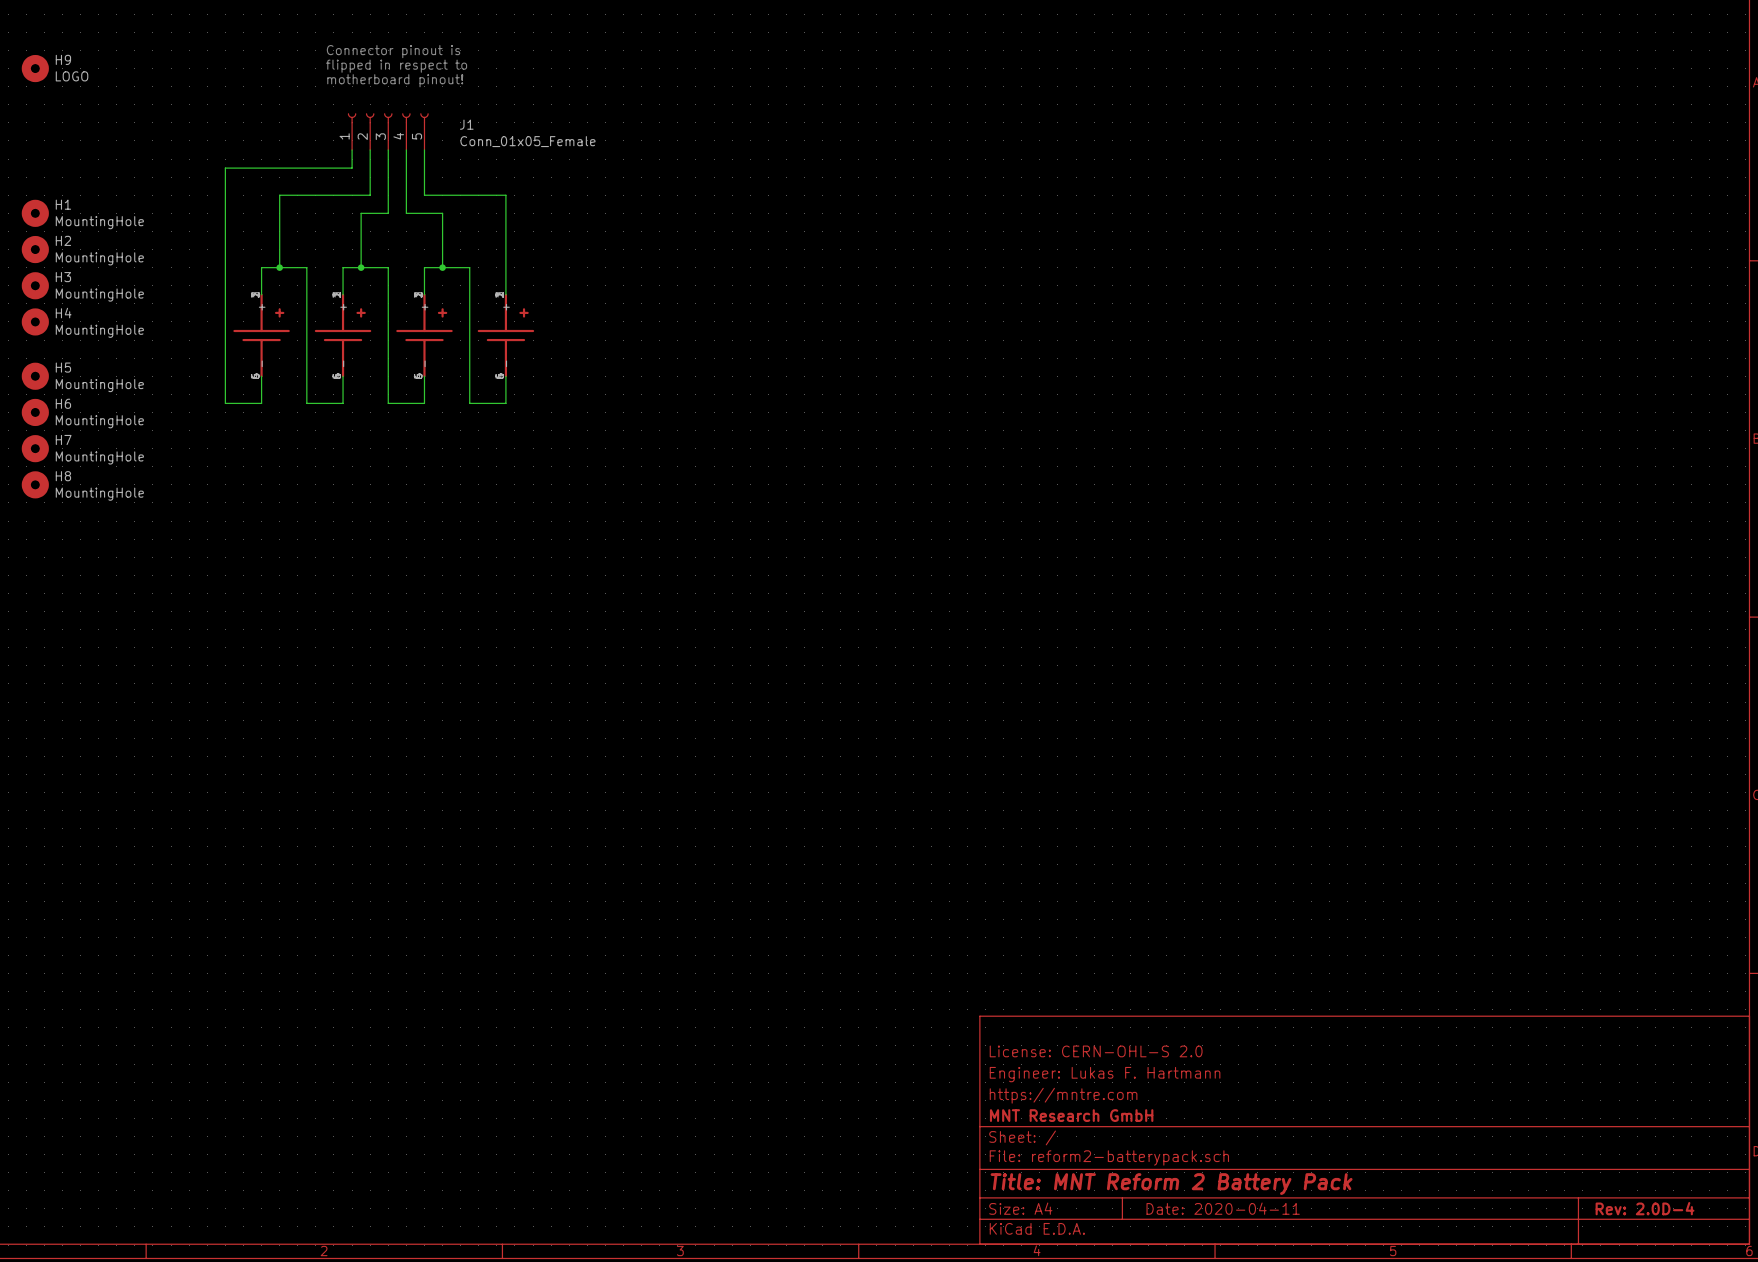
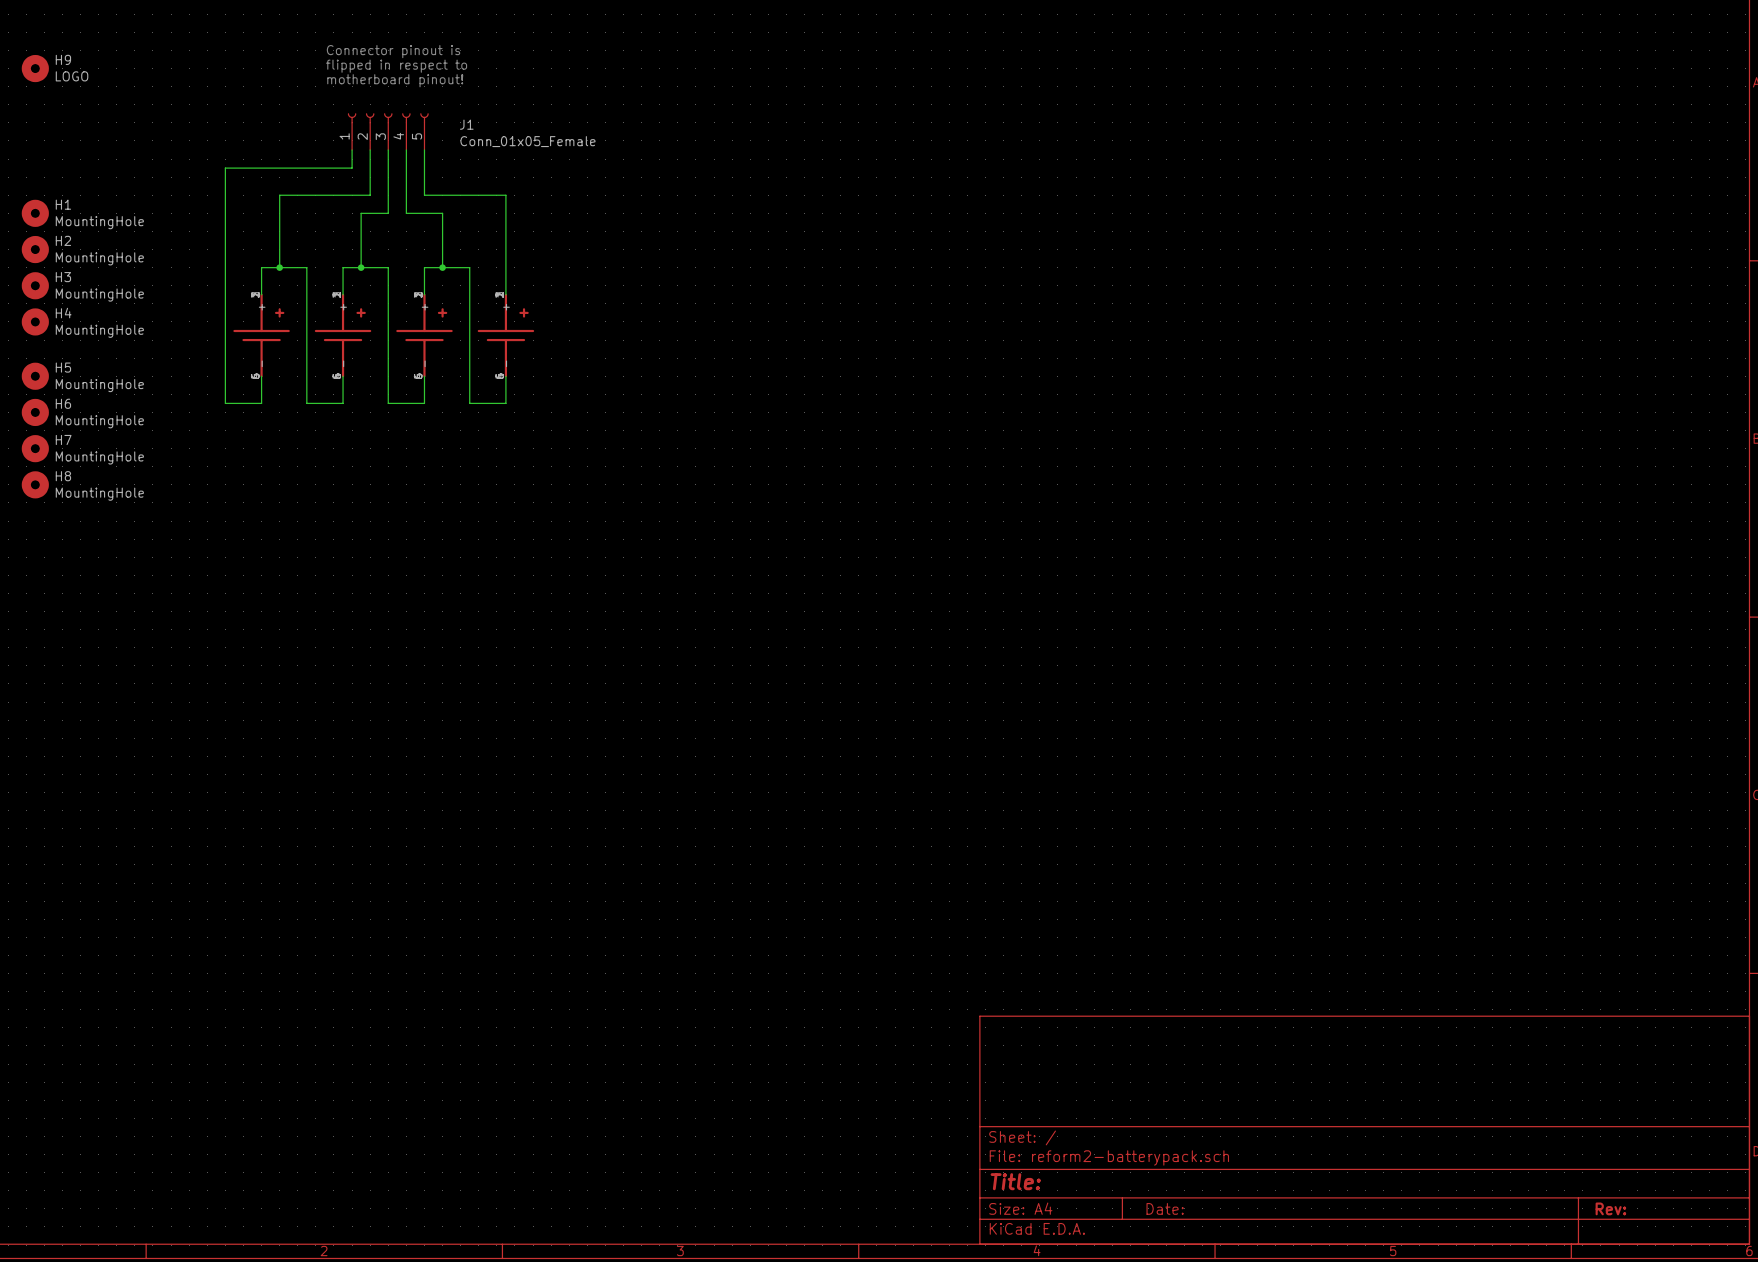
title block: License: CERN-OHL-S 2.0 (1096, 1051) -> none
title block: Engineer: Lukas F. Hartmann (1105, 1074) -> none
title block: https://mntre.com (1063, 1095) -> none
title block: MNT Research GmbH (1071, 1115) -> none
title block: Title: MNT Reform 2 Battery Pack (1171, 1184) -> Title: (1015, 1181)
title block: Date: 2020-04-11 (1223, 1208) -> Date: (1165, 1208)
title block: Rev: 2.0D-4 (1645, 1208) -> Rev: (1610, 1208)

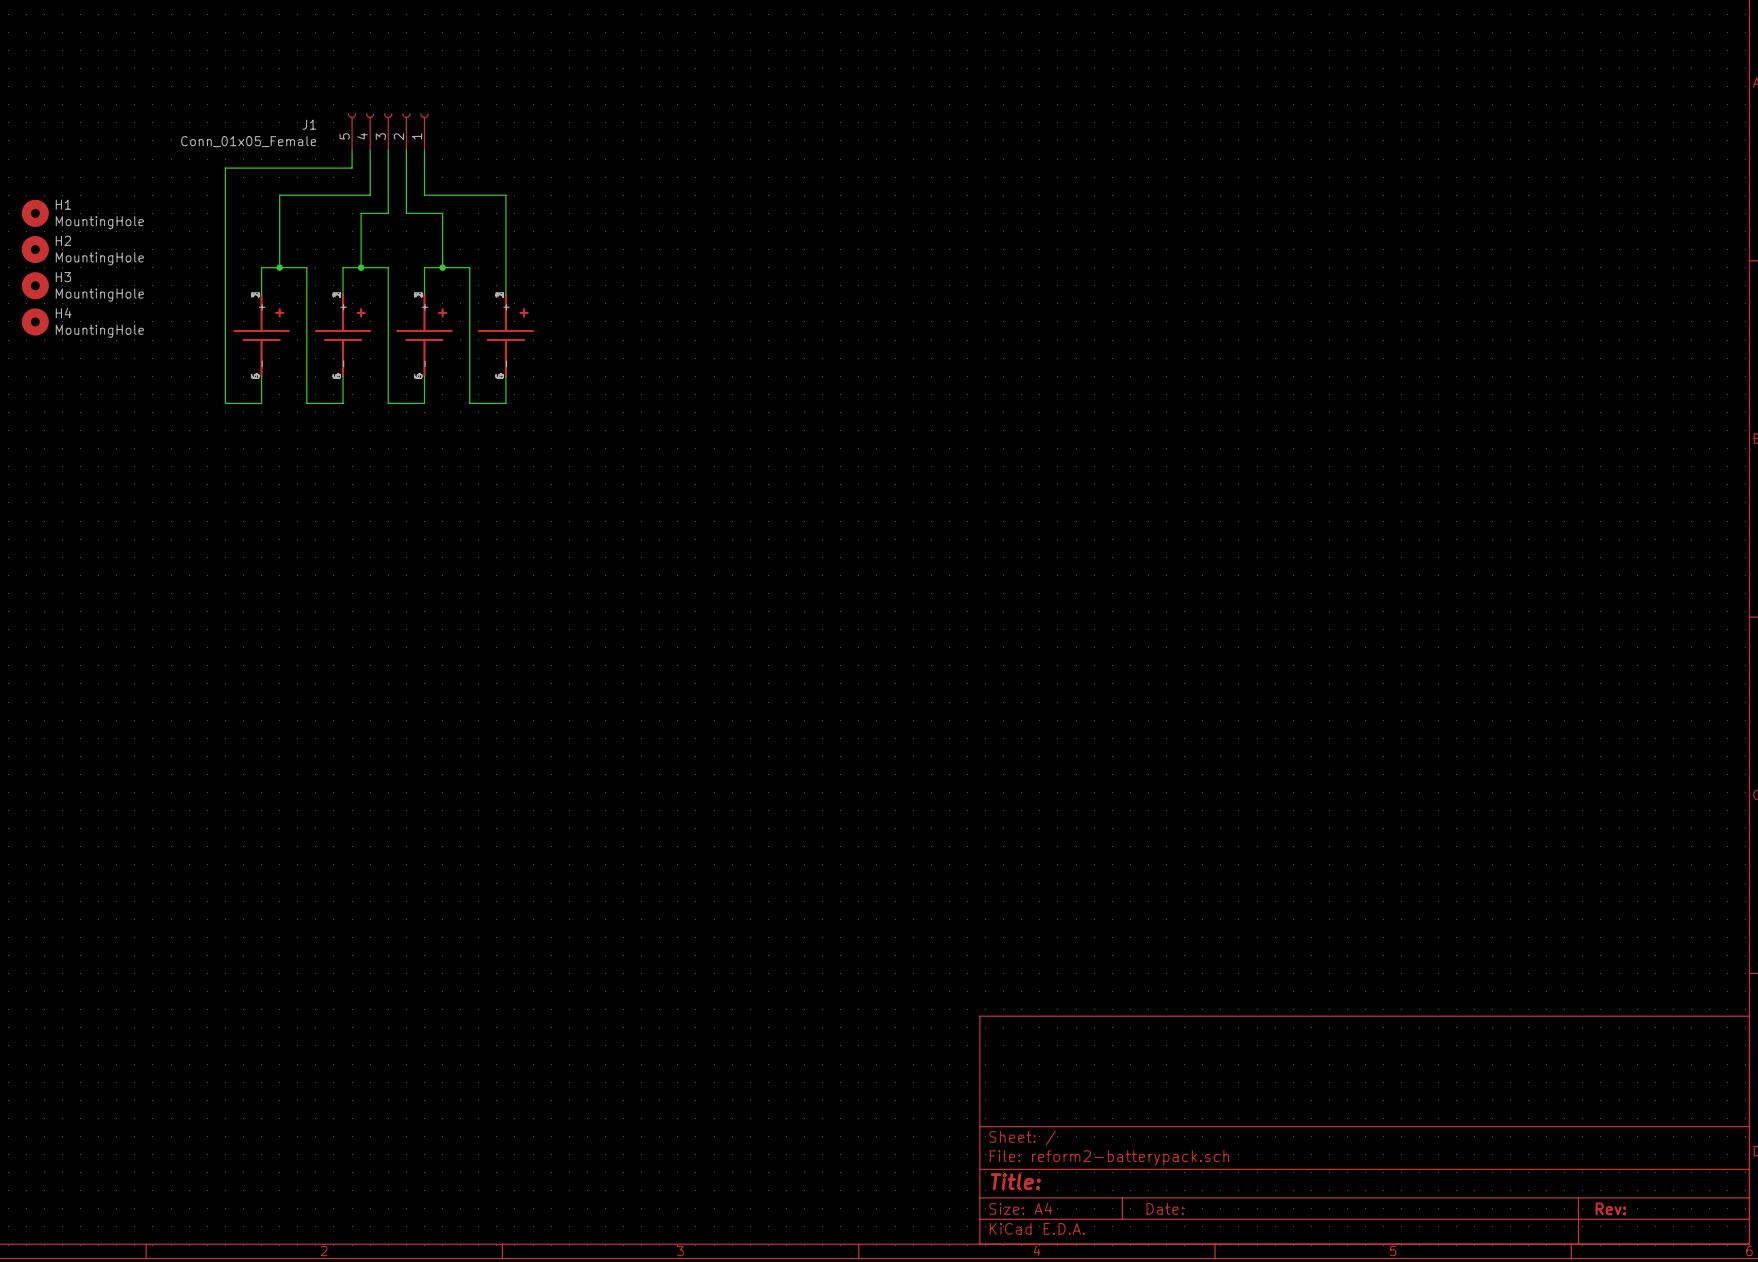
text: Connector pinout is (393, 51) -> none
text: flipped in respect to (396, 66) -> none
H9: LOGO (35, 68) -> none
text: motherboard pinout! (395, 80) -> none
J1 flip: as is (388, 118) -> left-right (388, 118)
H5: MountingHole (35, 376) -> none
H6: MountingHole (35, 412) -> none
H7: MountingHole (35, 448) -> none
H8: MountingHole (35, 484) -> none

